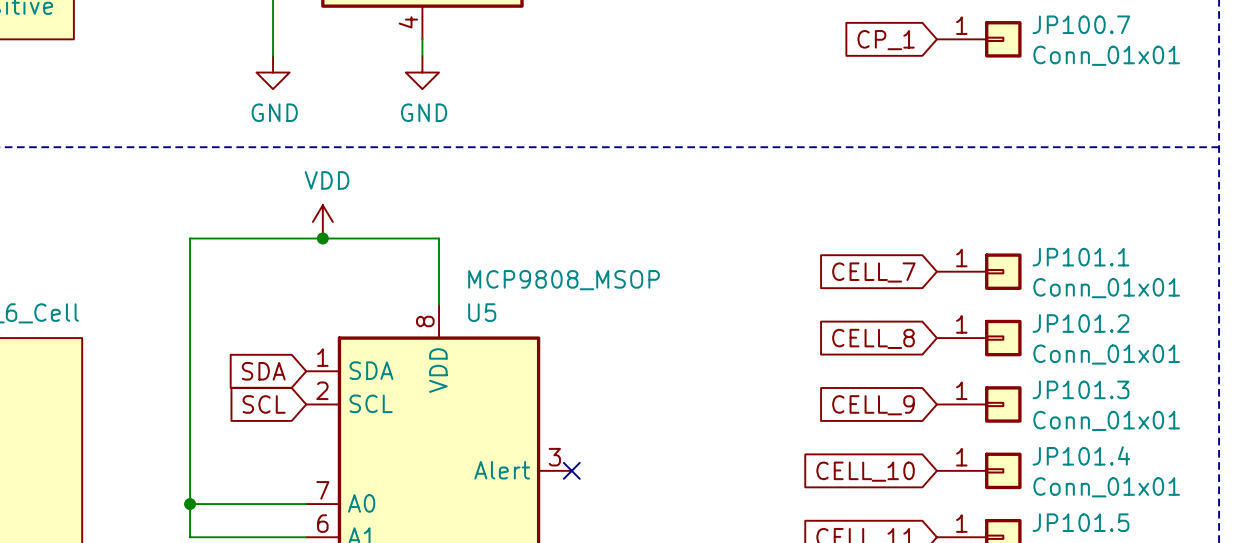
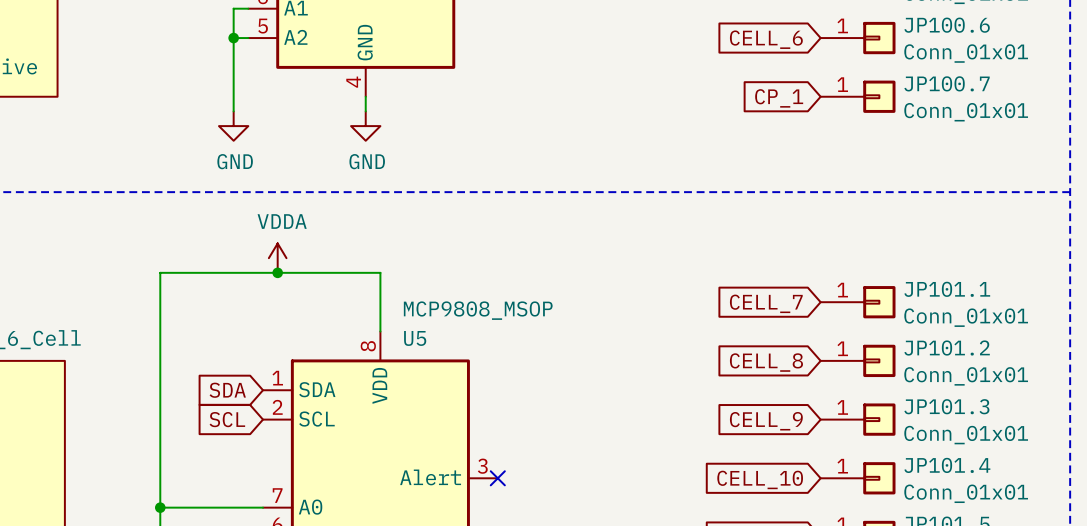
power symbol: VDD (322, 221) -> VDDA (277, 258)

